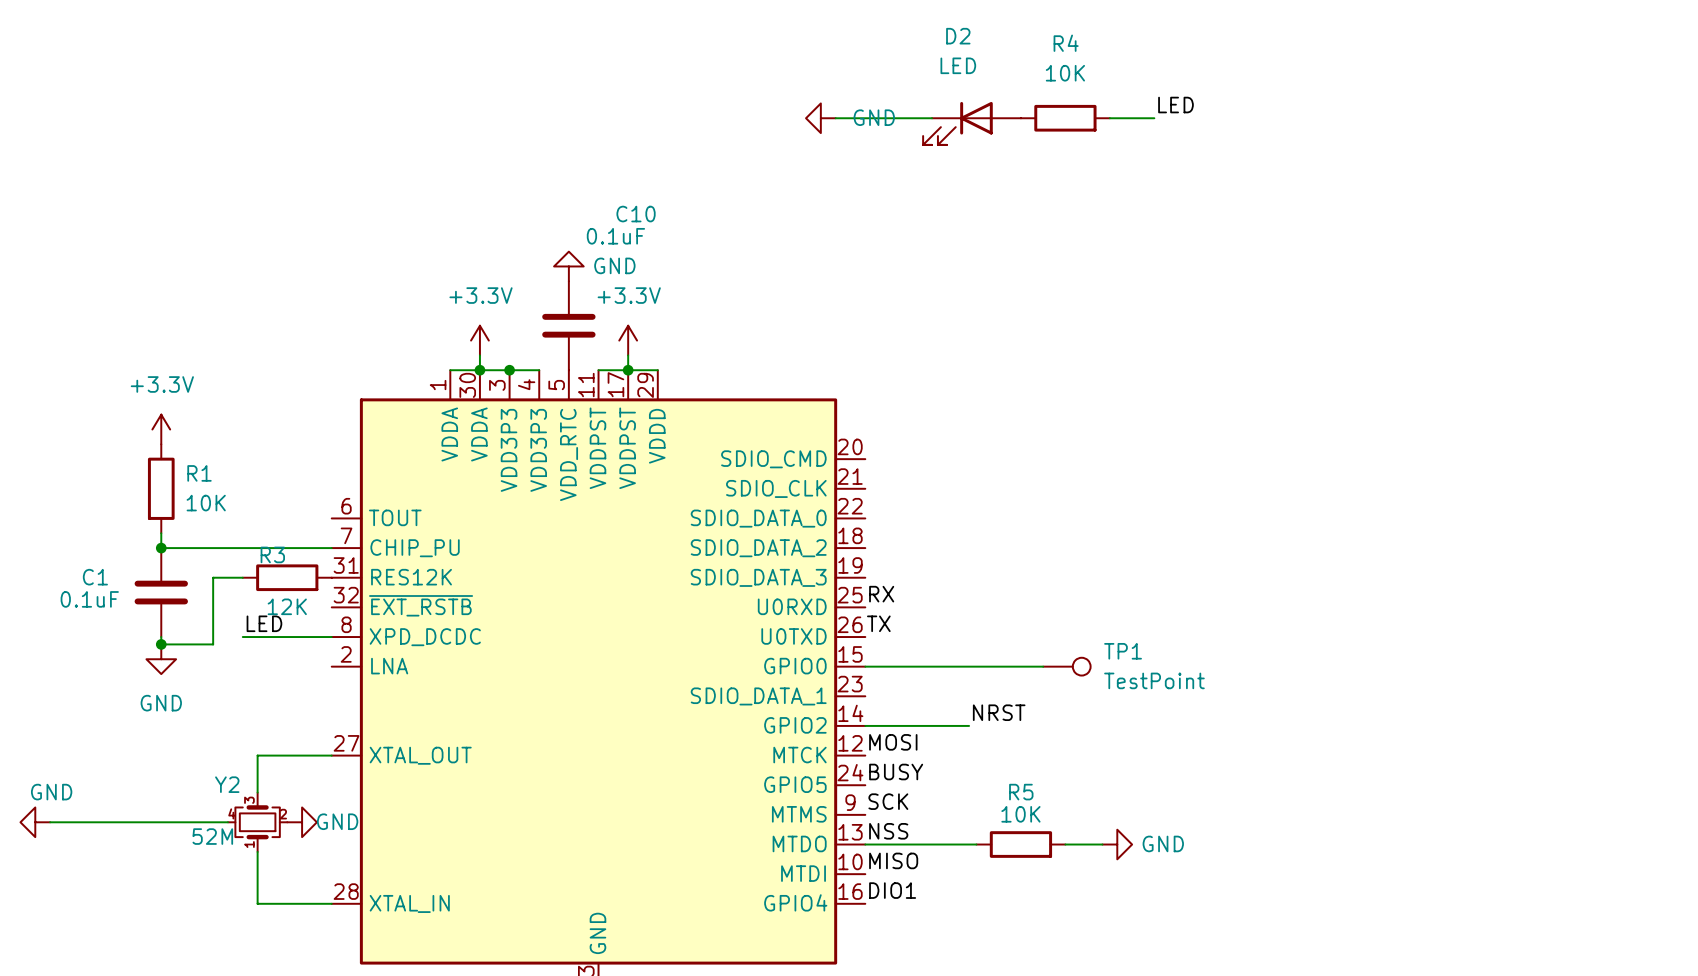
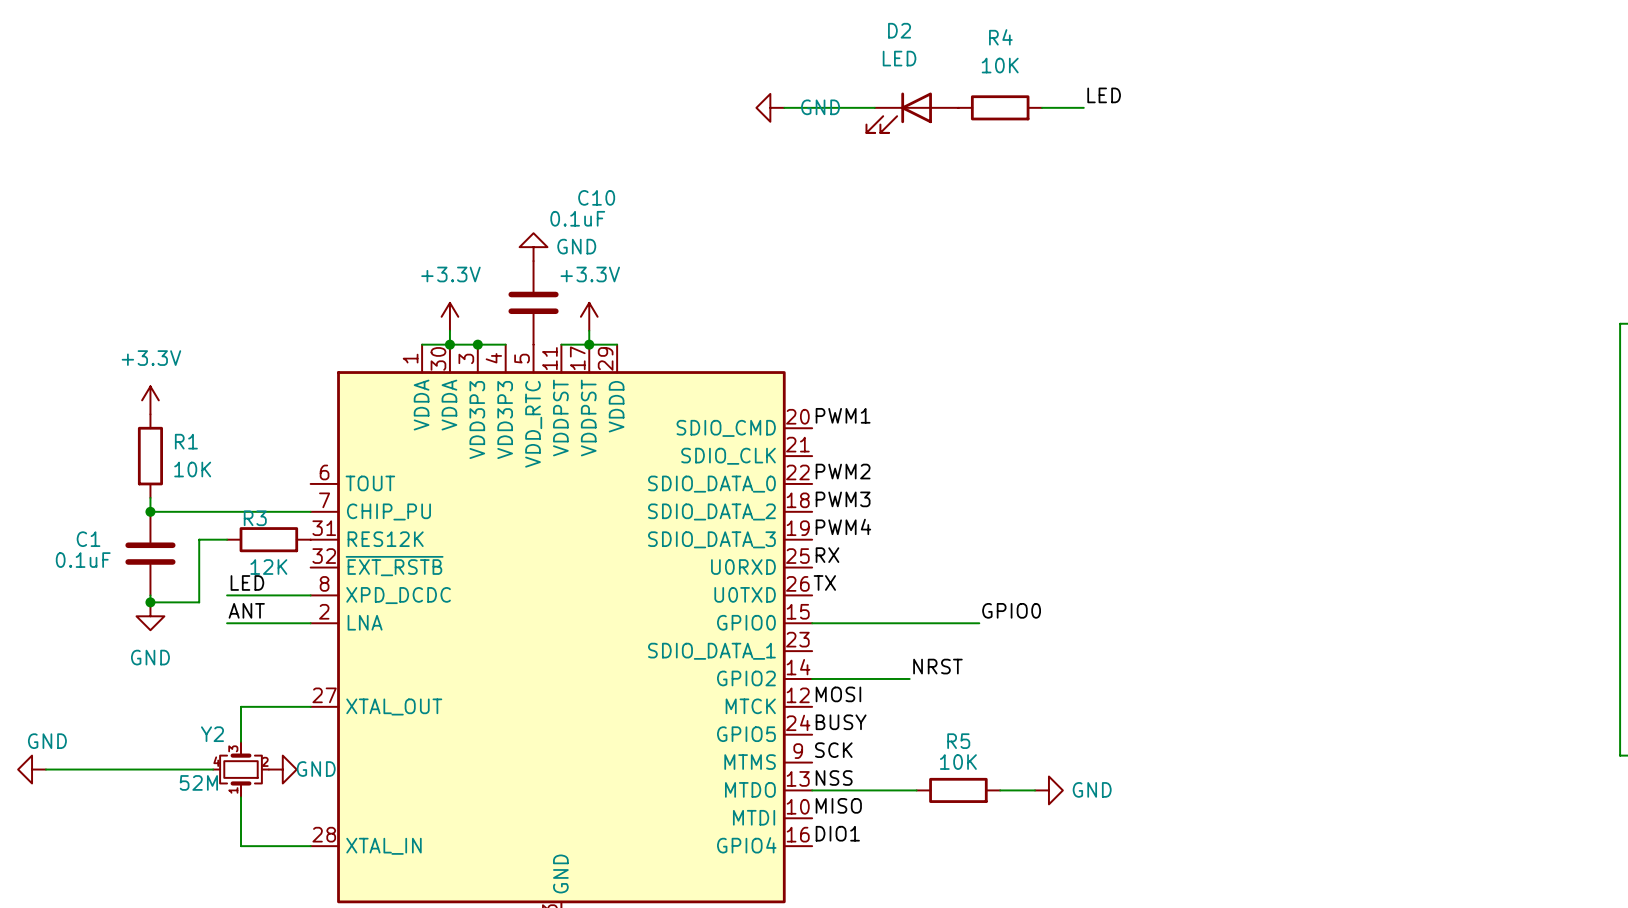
label: none -> PWM1 (843, 415)
label: none -> PWM2 (843, 471)
label: none -> PWM3 (843, 499)
label: none -> PWM4 (843, 526)
label: none -> ANT (246, 610)
label: none -> GPIO0 (1011, 610)
wire: none -> (227, 623) (310, 623)
TP1: TestPoint (1066, 666) -> none

